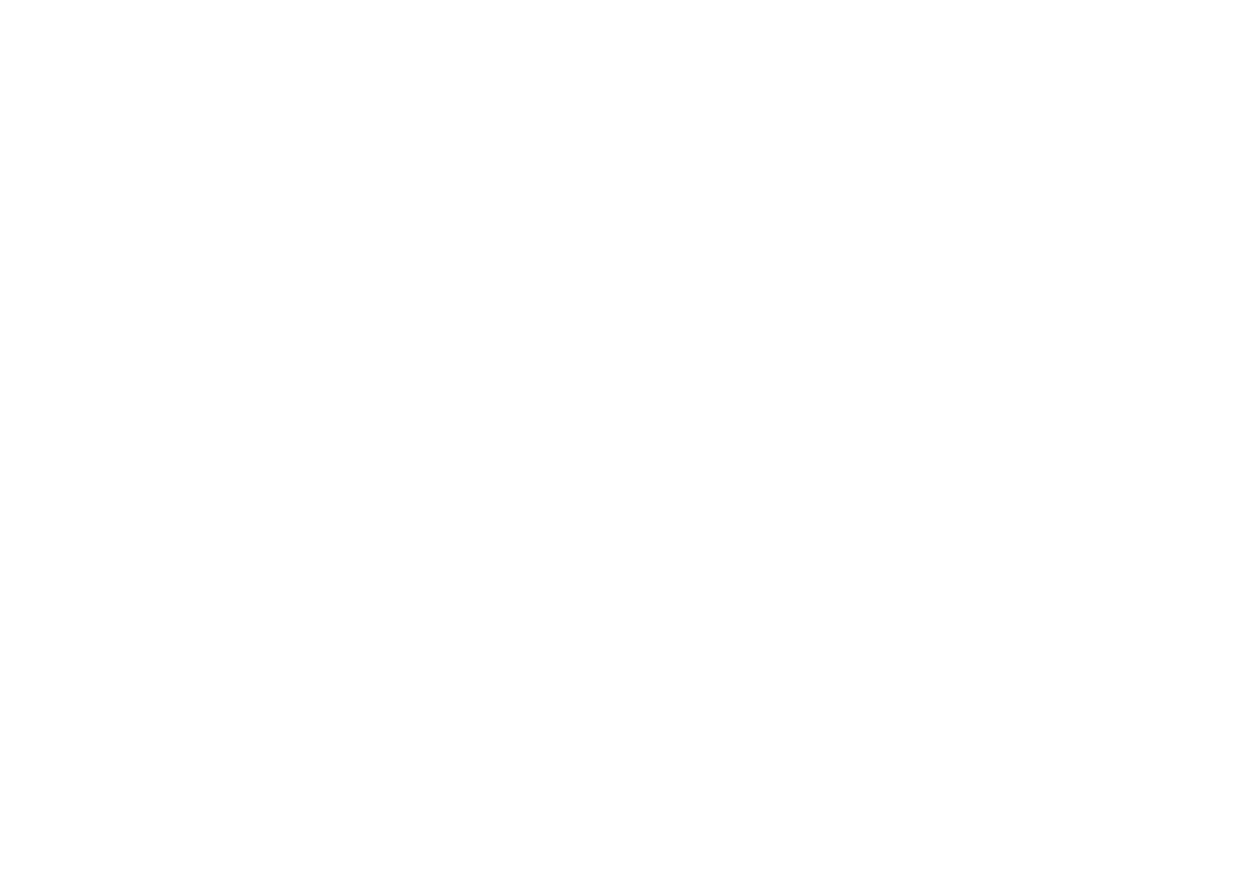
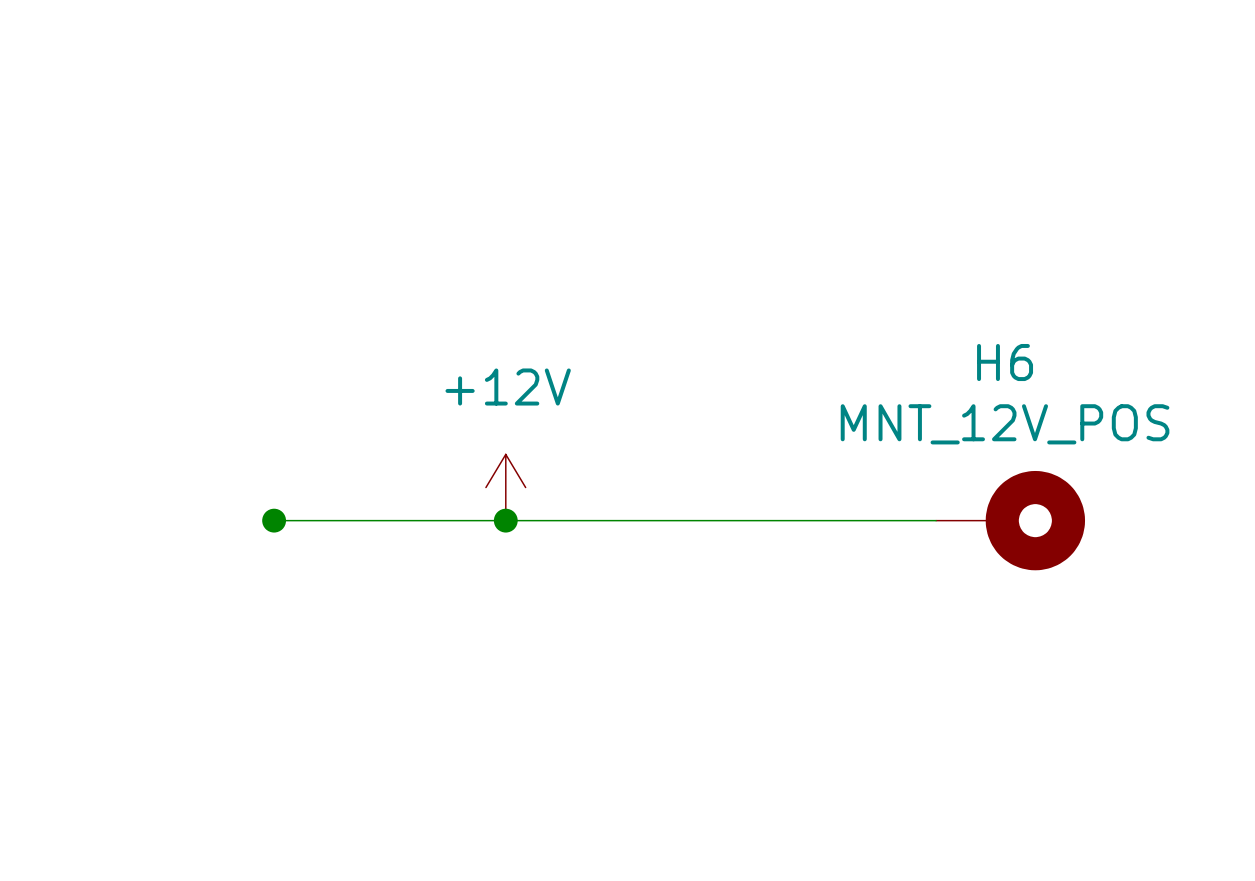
power symbol: none -> +12V (505, 487)
wire: none -> (274, 520) (936, 520)
junction: none -> (274, 520)
junction: none -> (505, 520)
H6: none -> MNT_12V_POS (1010, 520)

